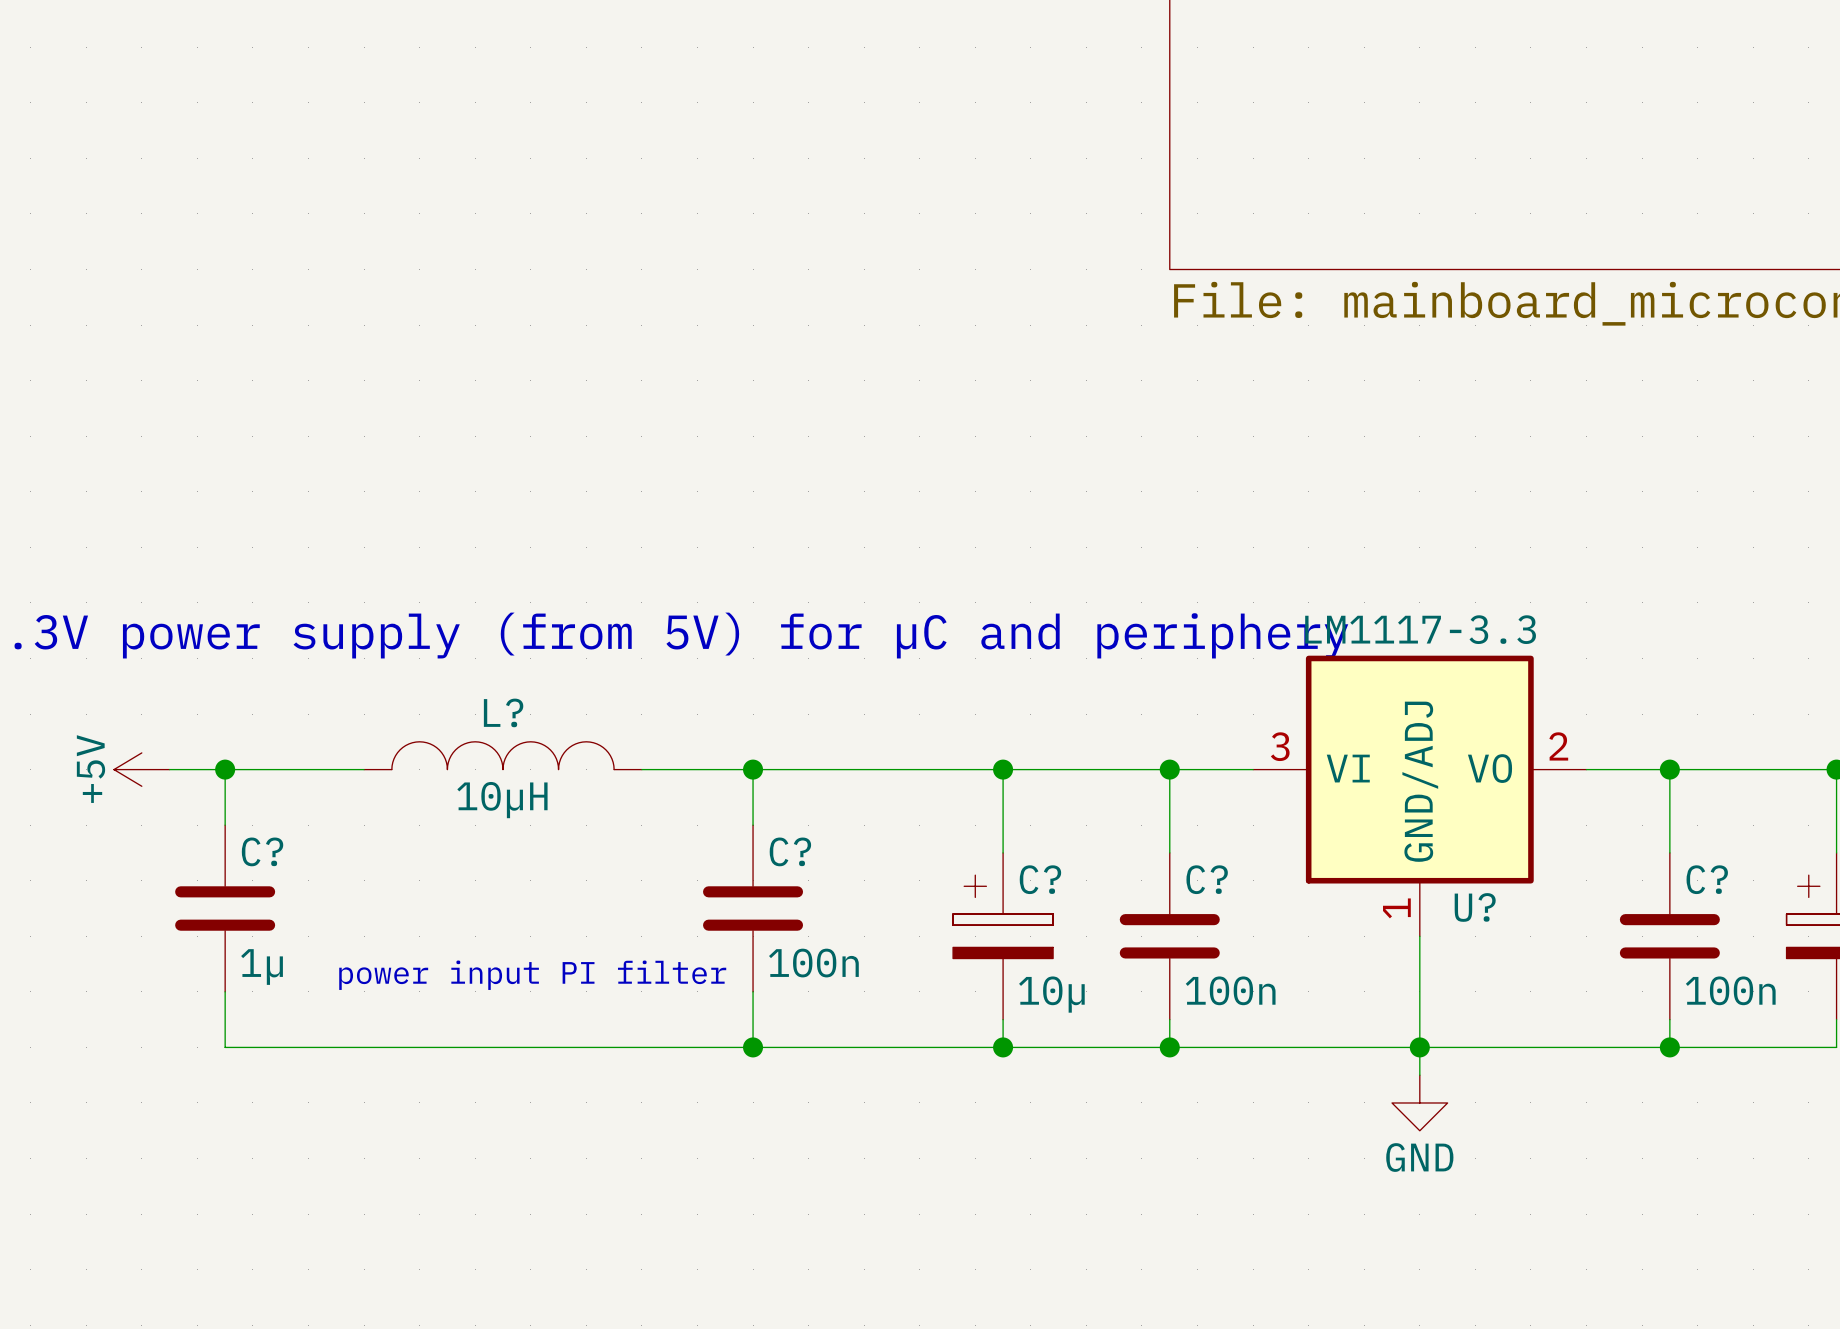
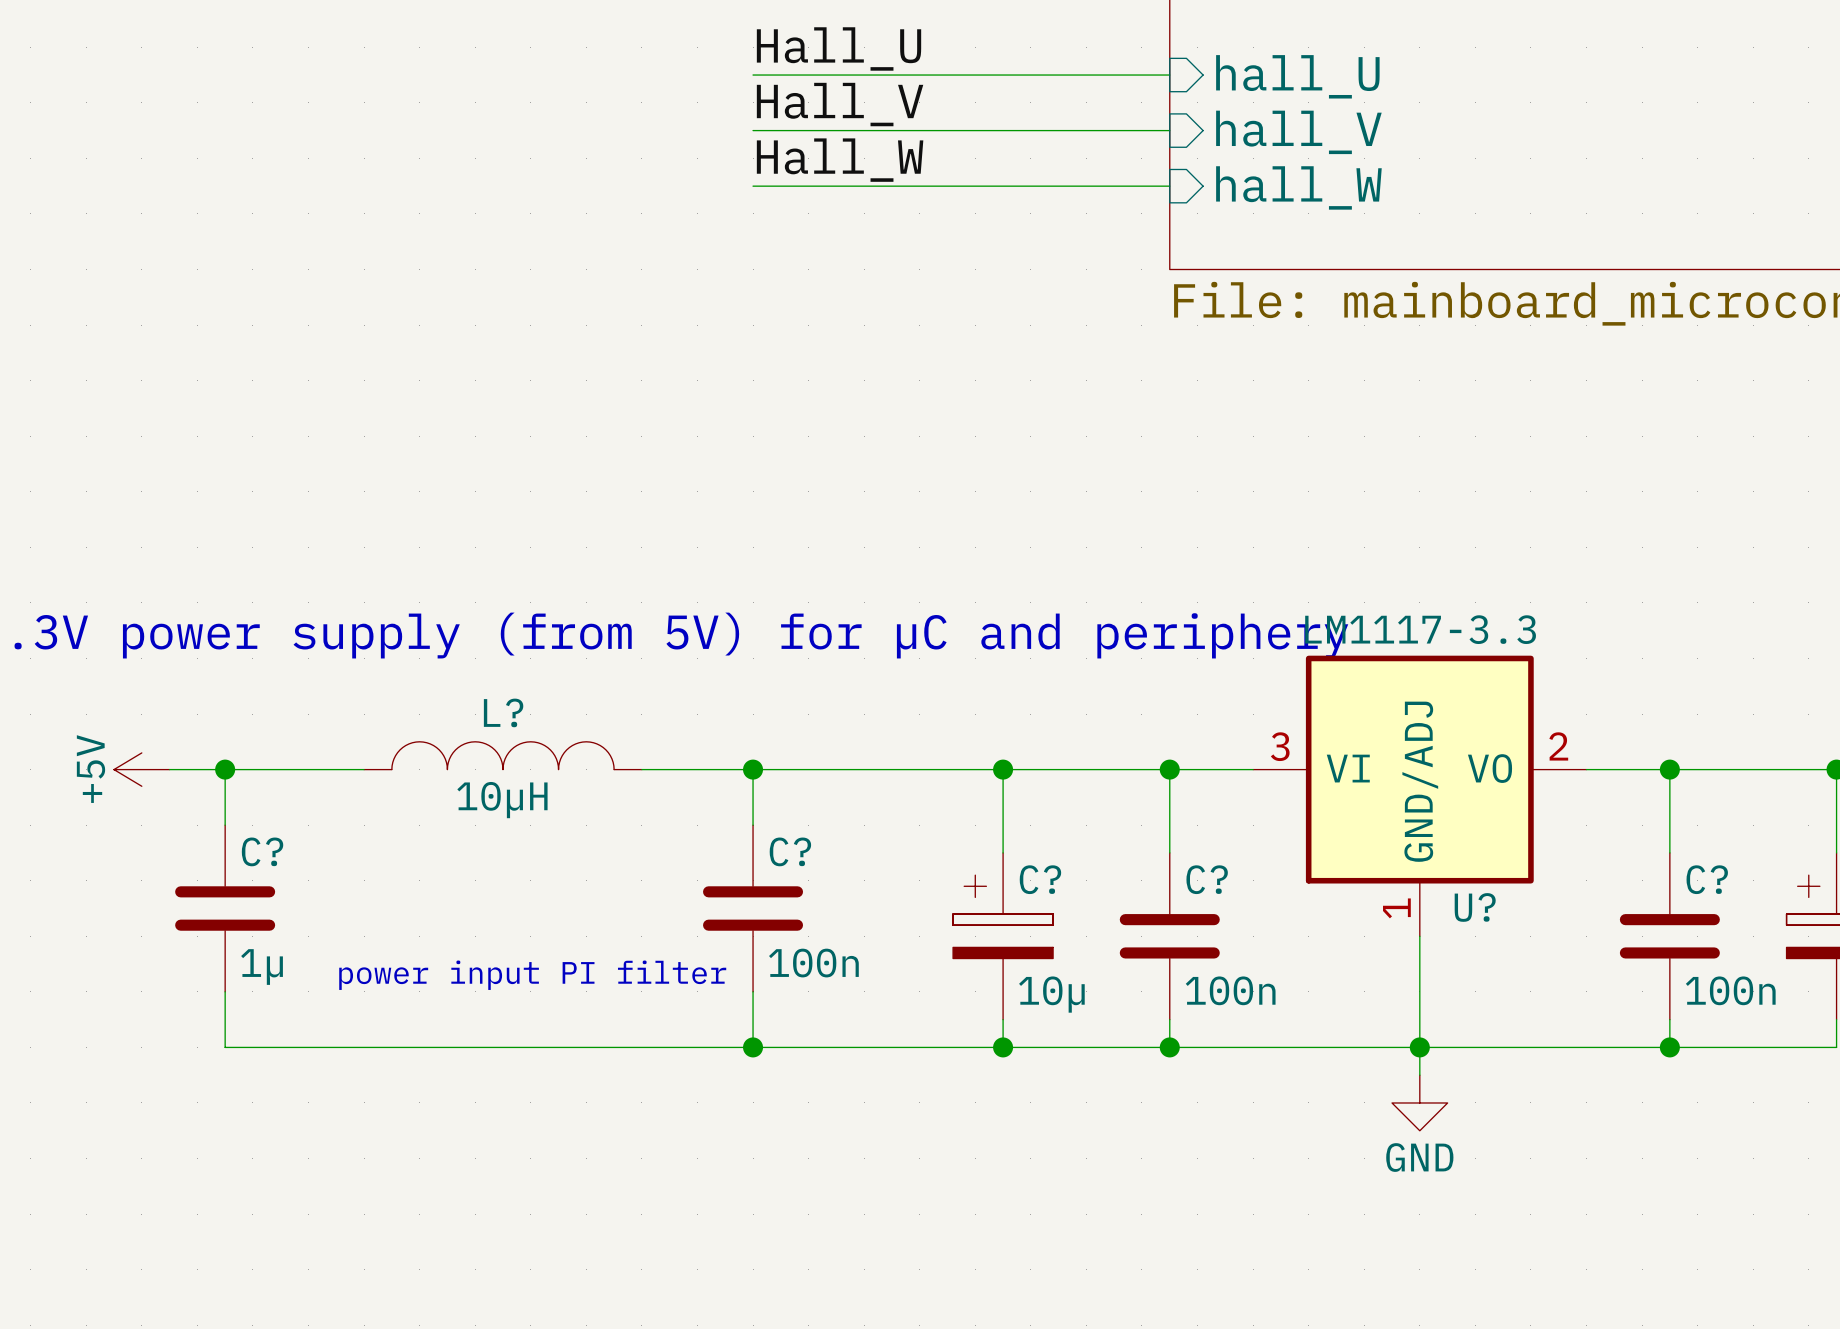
label: none -> Hall_U (839, 48)
wire: none -> (753, 75) (1169, 75)
sheet pin: none -> hall_U (1297, 76)
label: none -> Hall_V (840, 104)
wire: none -> (753, 130) (1169, 130)
sheet pin: none -> hall_V (1298, 132)
label: none -> Hall_W (840, 160)
wire: none -> (753, 186) (1169, 186)
sheet pin: none -> hall_W (1298, 187)

